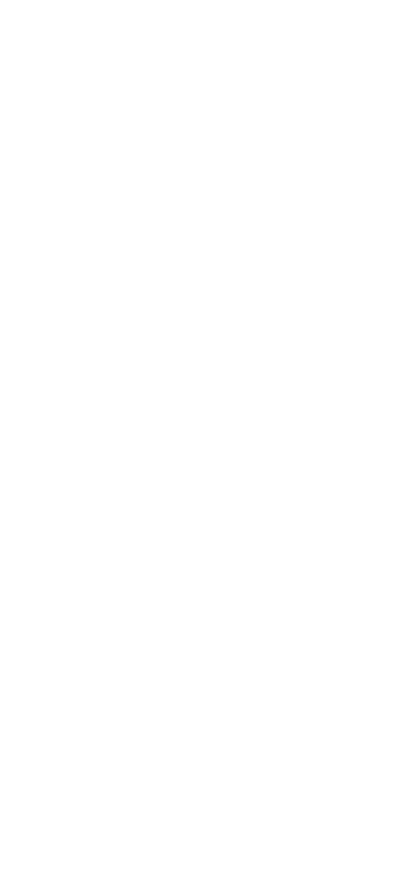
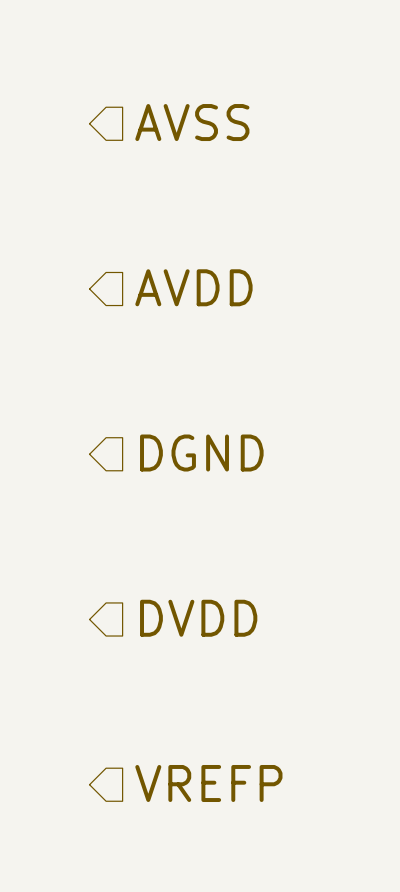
hierarchical label: none -> AVSS (192, 122)
hierarchical label: none -> AVDD (193, 287)
hierarchical label: none -> DGND (201, 453)
hierarchical label: none -> DVDD (198, 618)
hierarchical label: none -> VREFP (208, 783)

